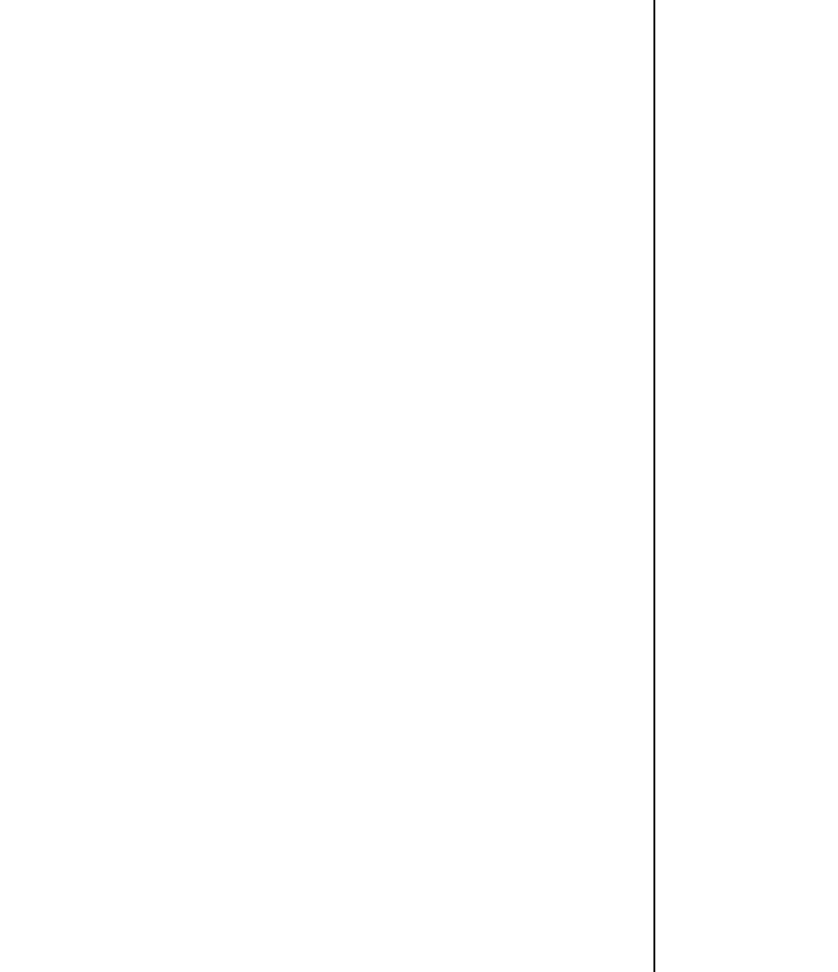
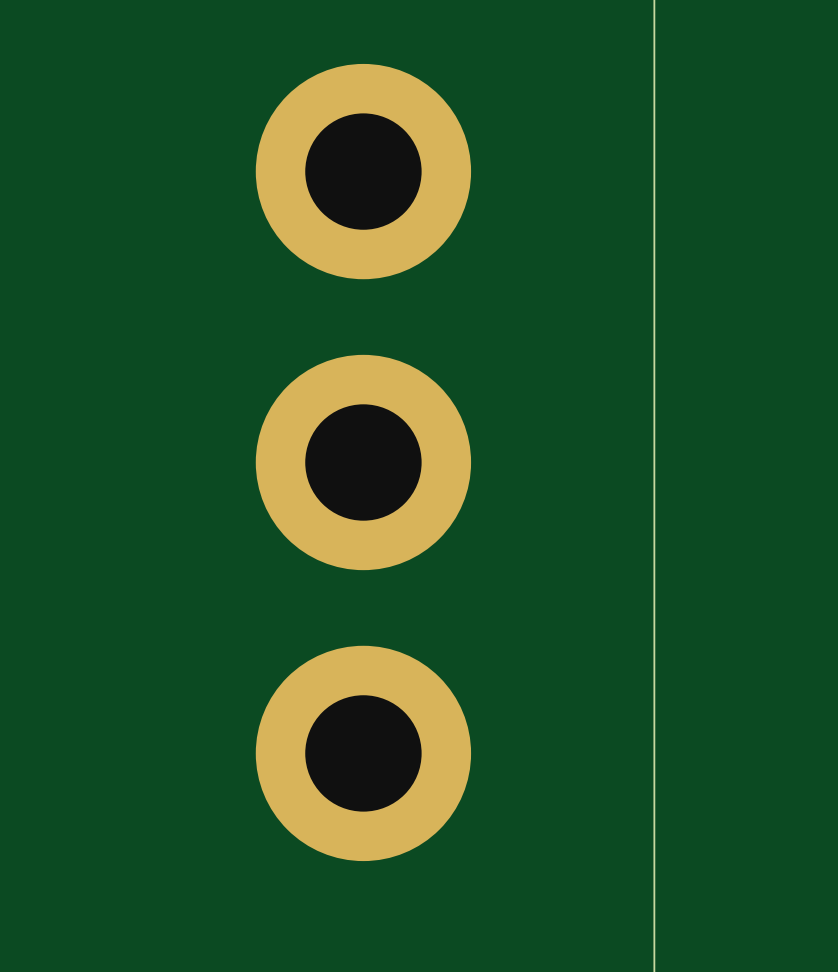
part: none -> (363, 462)

